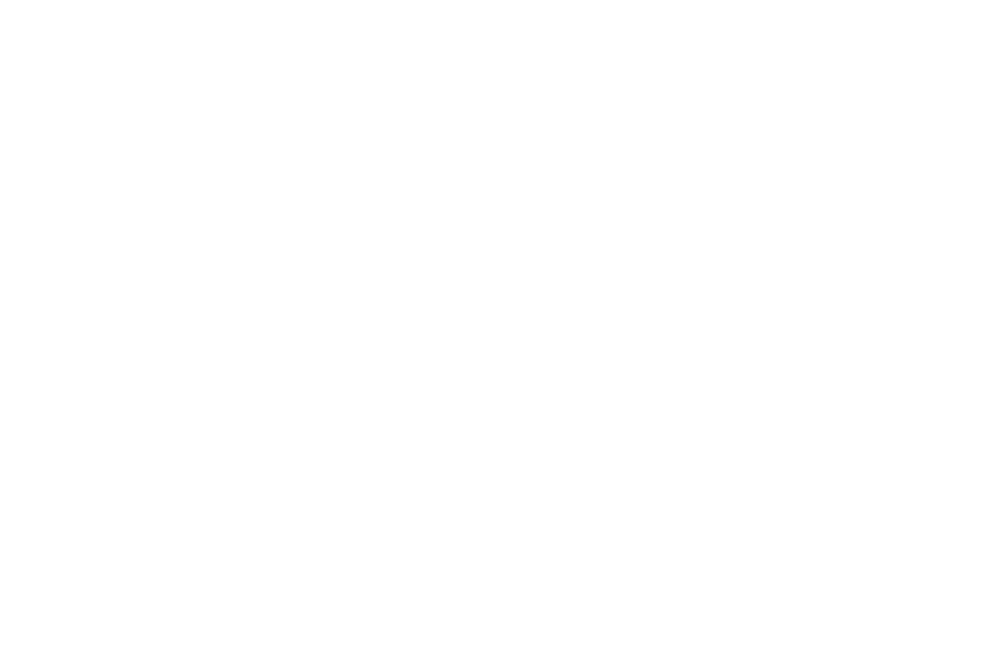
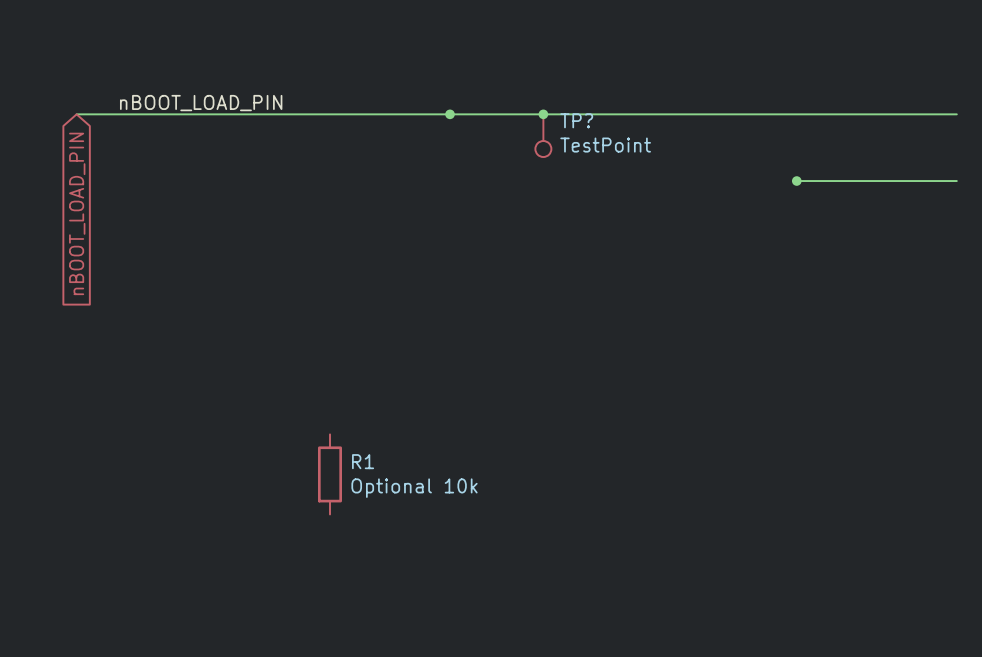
label: none -> nBOOT_LOAD_PIN (201, 103)
wire: none -> (76, 114) (956, 114)
junction: none -> (450, 114)
junction: none -> (543, 114)
TP?: none -> TestPoint (543, 135)
wire: none -> (796, 181) (956, 181)
junction: none -> (796, 181)
global label: none -> nBOOT_LOAD_PIN (77, 213)
R1: none -> Optional 10k (330, 474)

